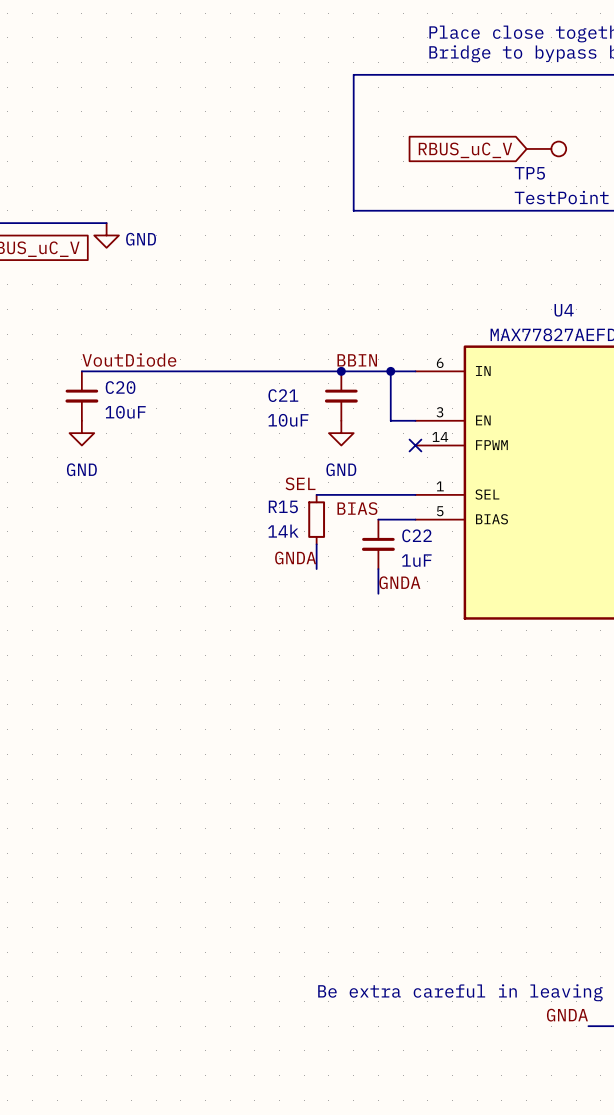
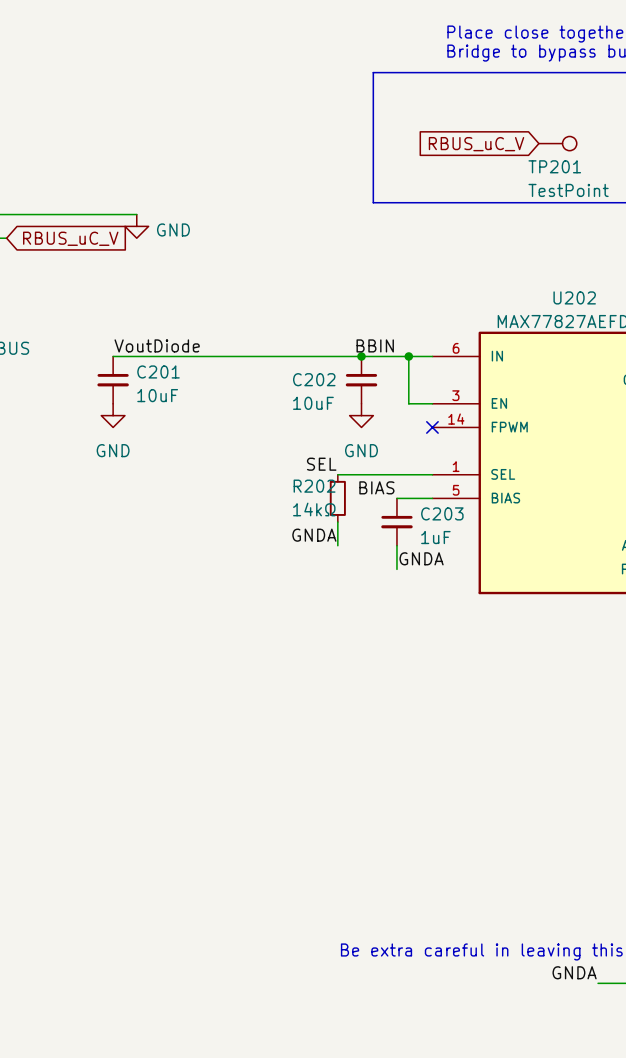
TP5 name: TP5 (529, 173) -> TP201 (554, 166)
U4 name: U4 (564, 310) -> U202 (574, 297)
C20 name: C20 (120, 387) -> C201 (158, 371)
C21 name: C21 (283, 395) -> C202 (314, 379)
R15 name: R15 (283, 506) -> R202 (314, 486)
R15 value: 14k (283, 531) -> 14kΩ (314, 509)
C22 name: C22 (417, 535) -> C203 (442, 513)

